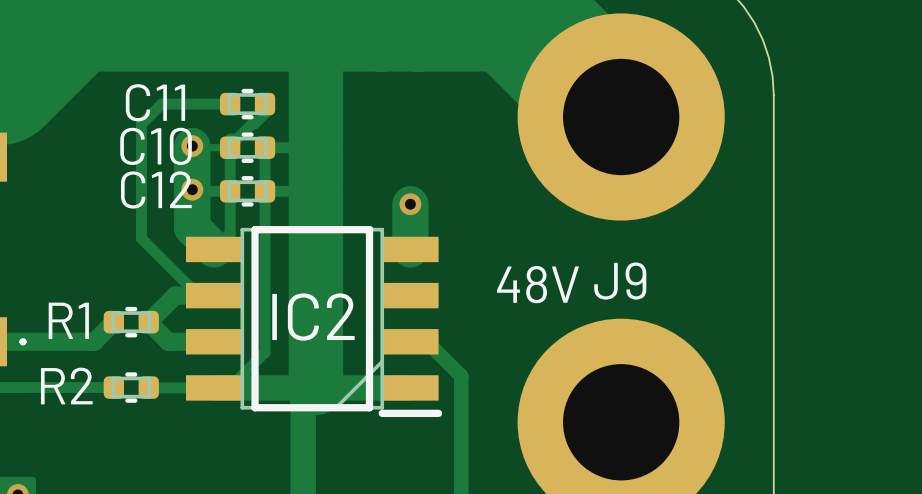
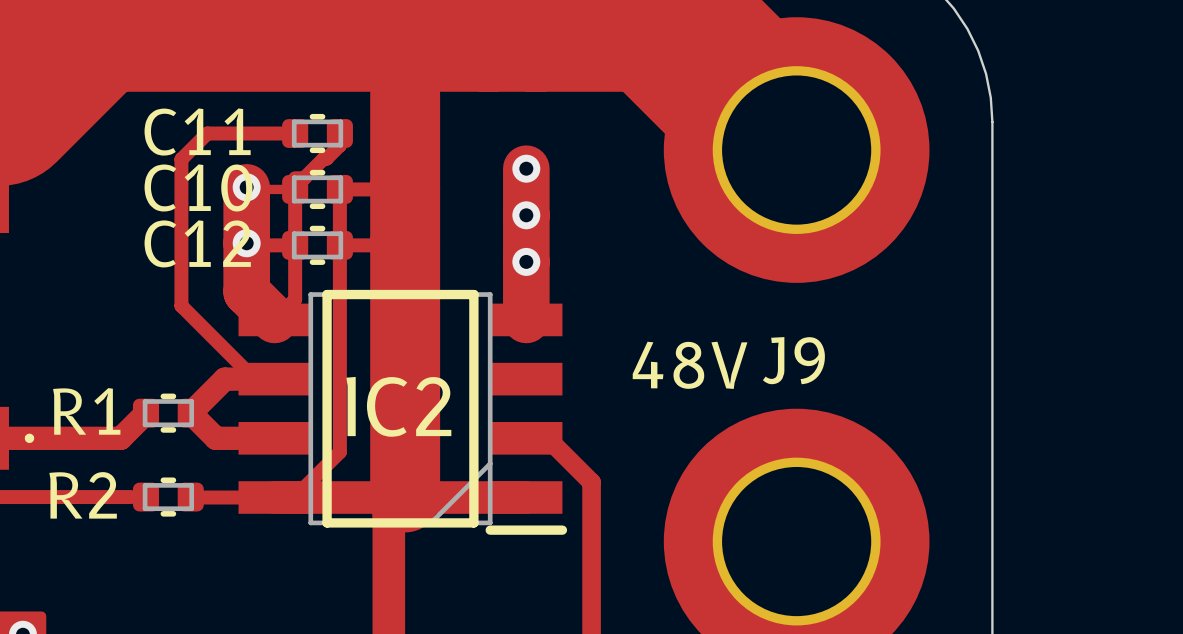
track: none -> (526, 168) (526, 261)
via: none -> (526, 168)
via: none -> (526, 215)

